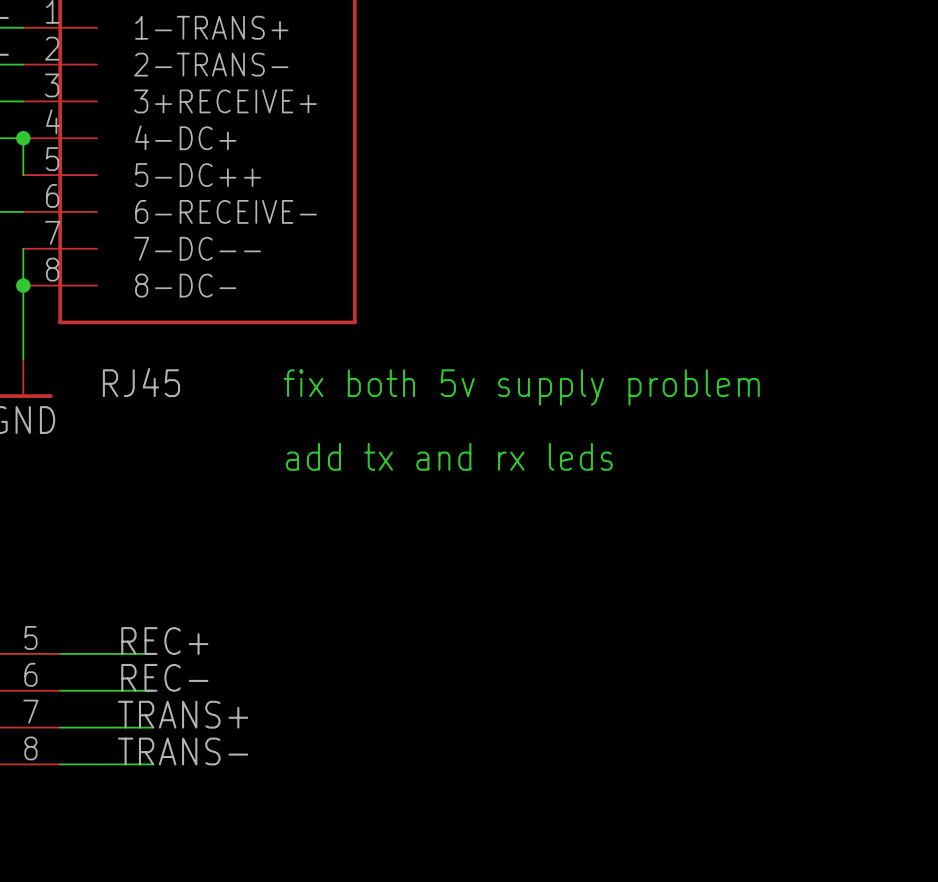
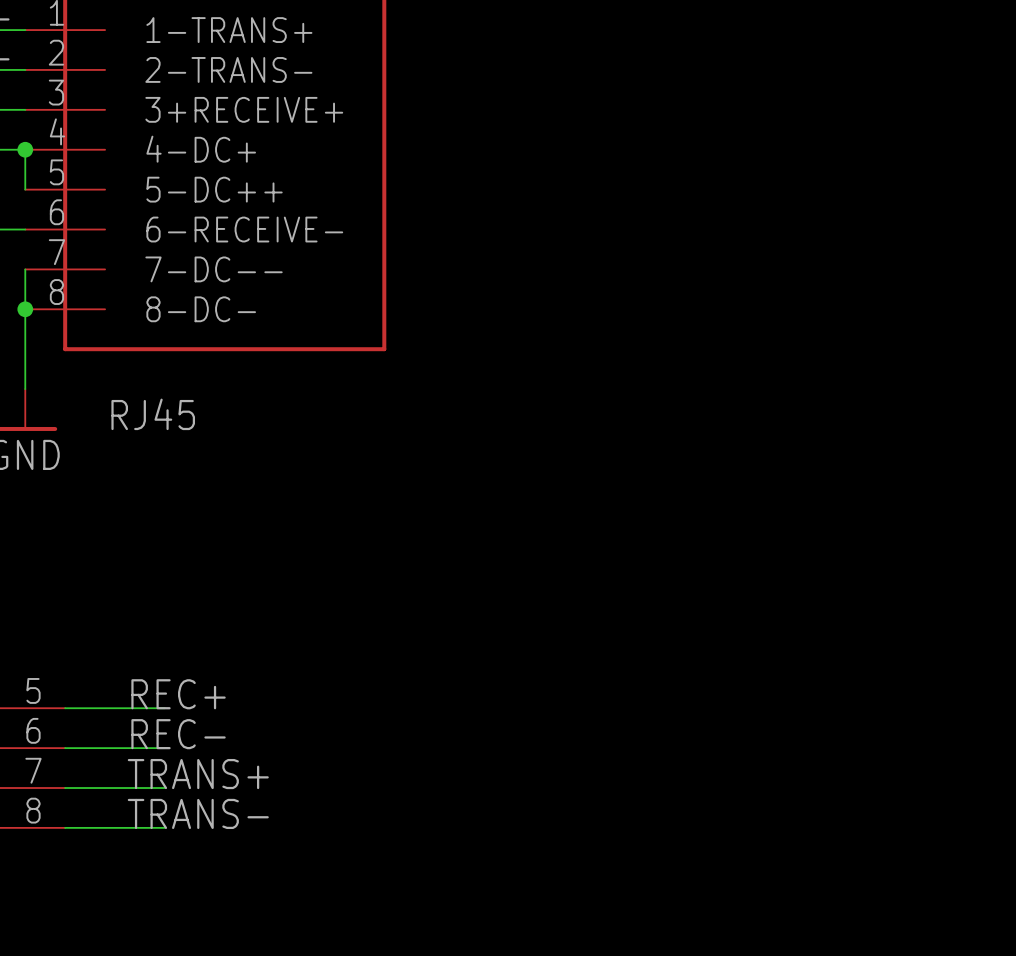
text: fix both 5v supply problem (521, 387) -> none
text: add tx and rx leds (449, 456) -> none

